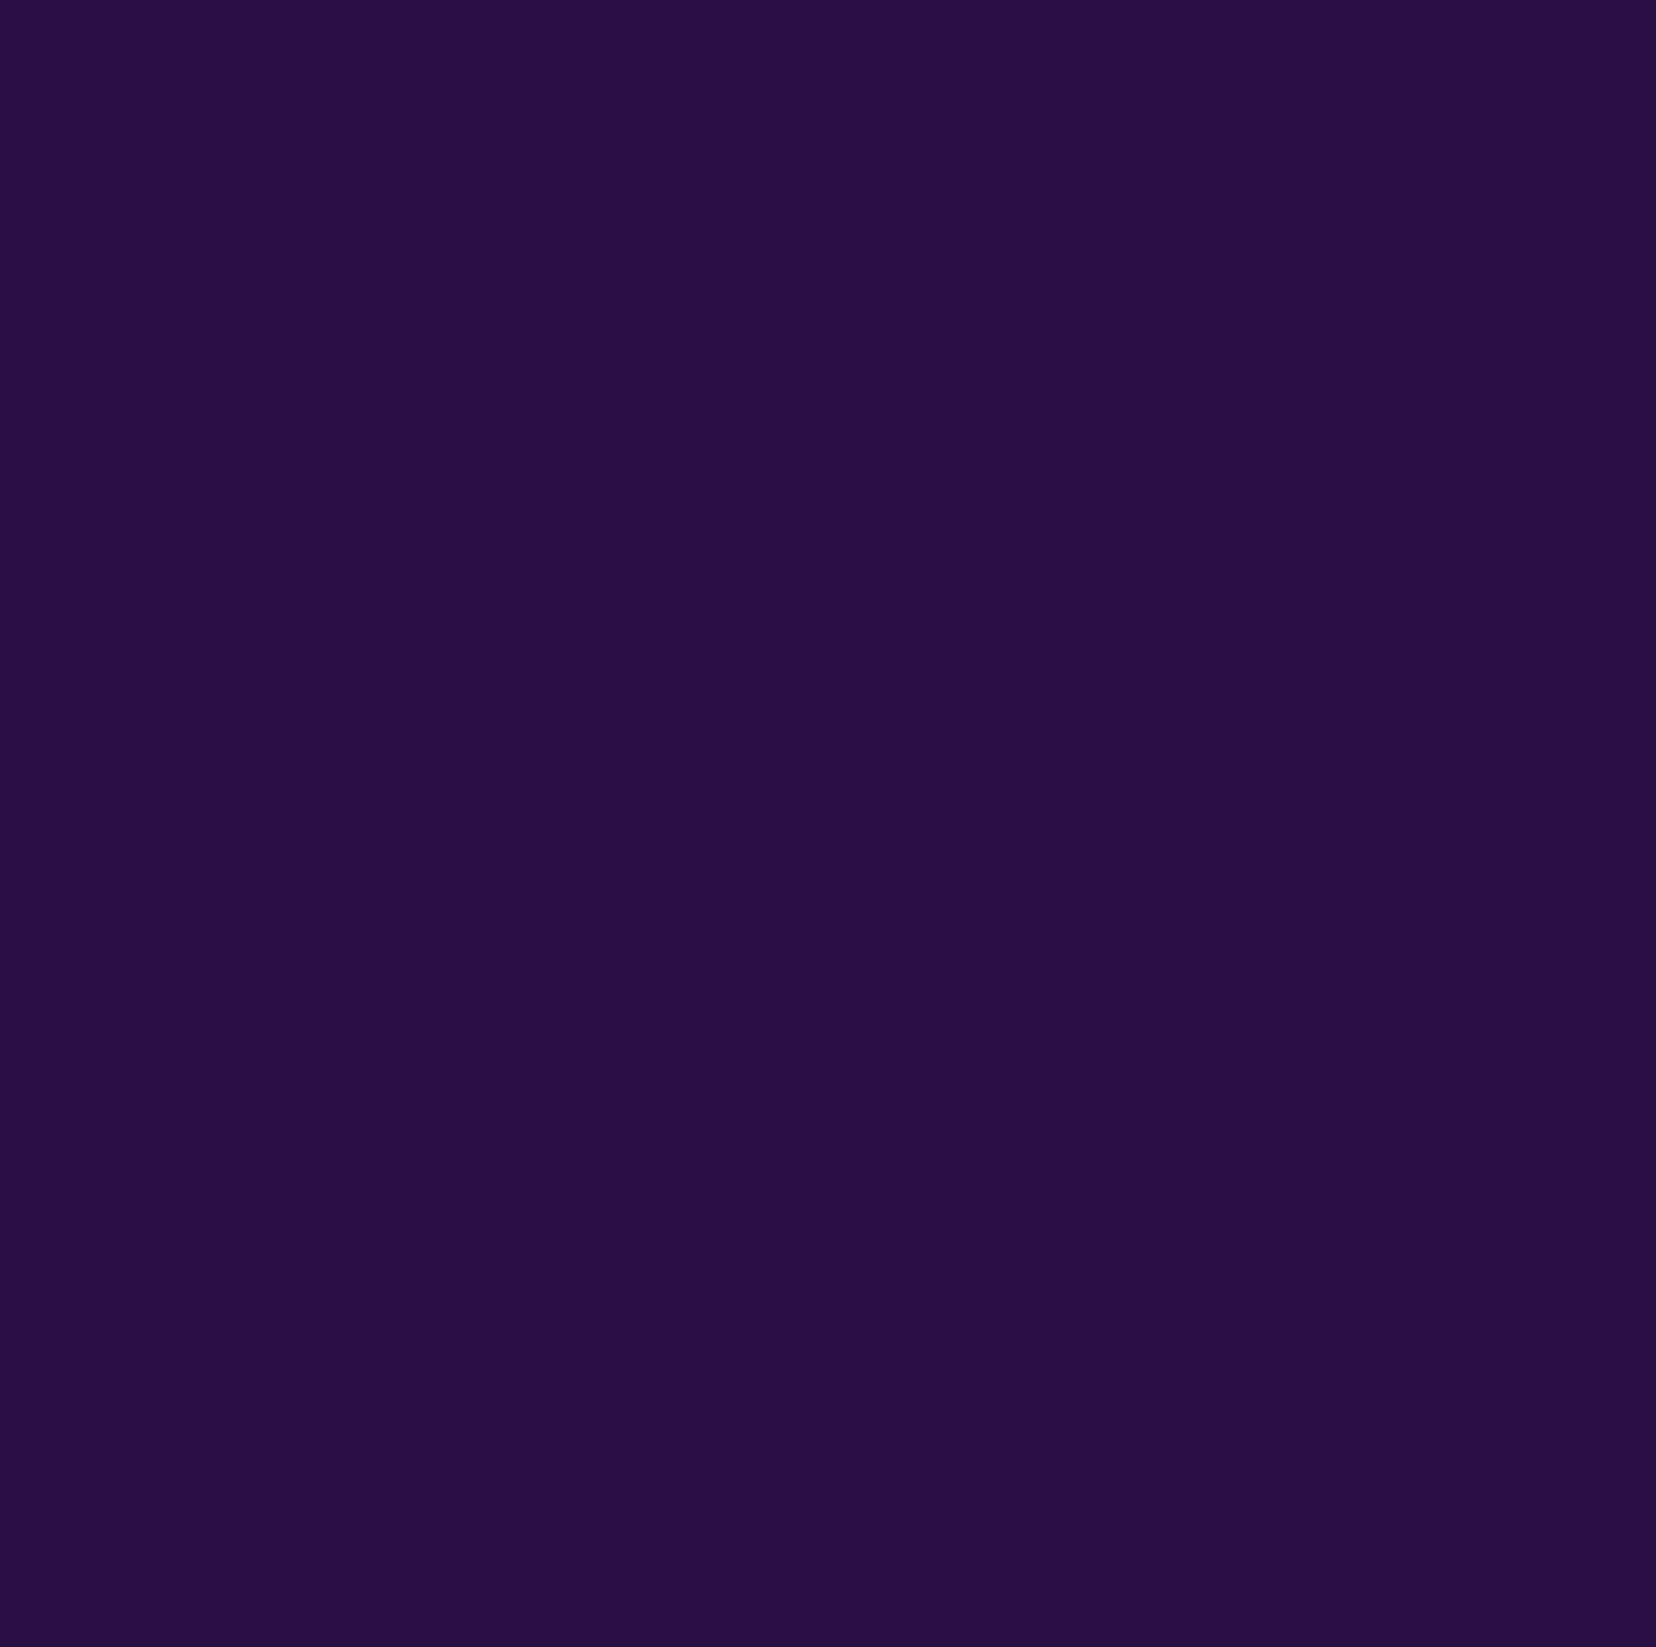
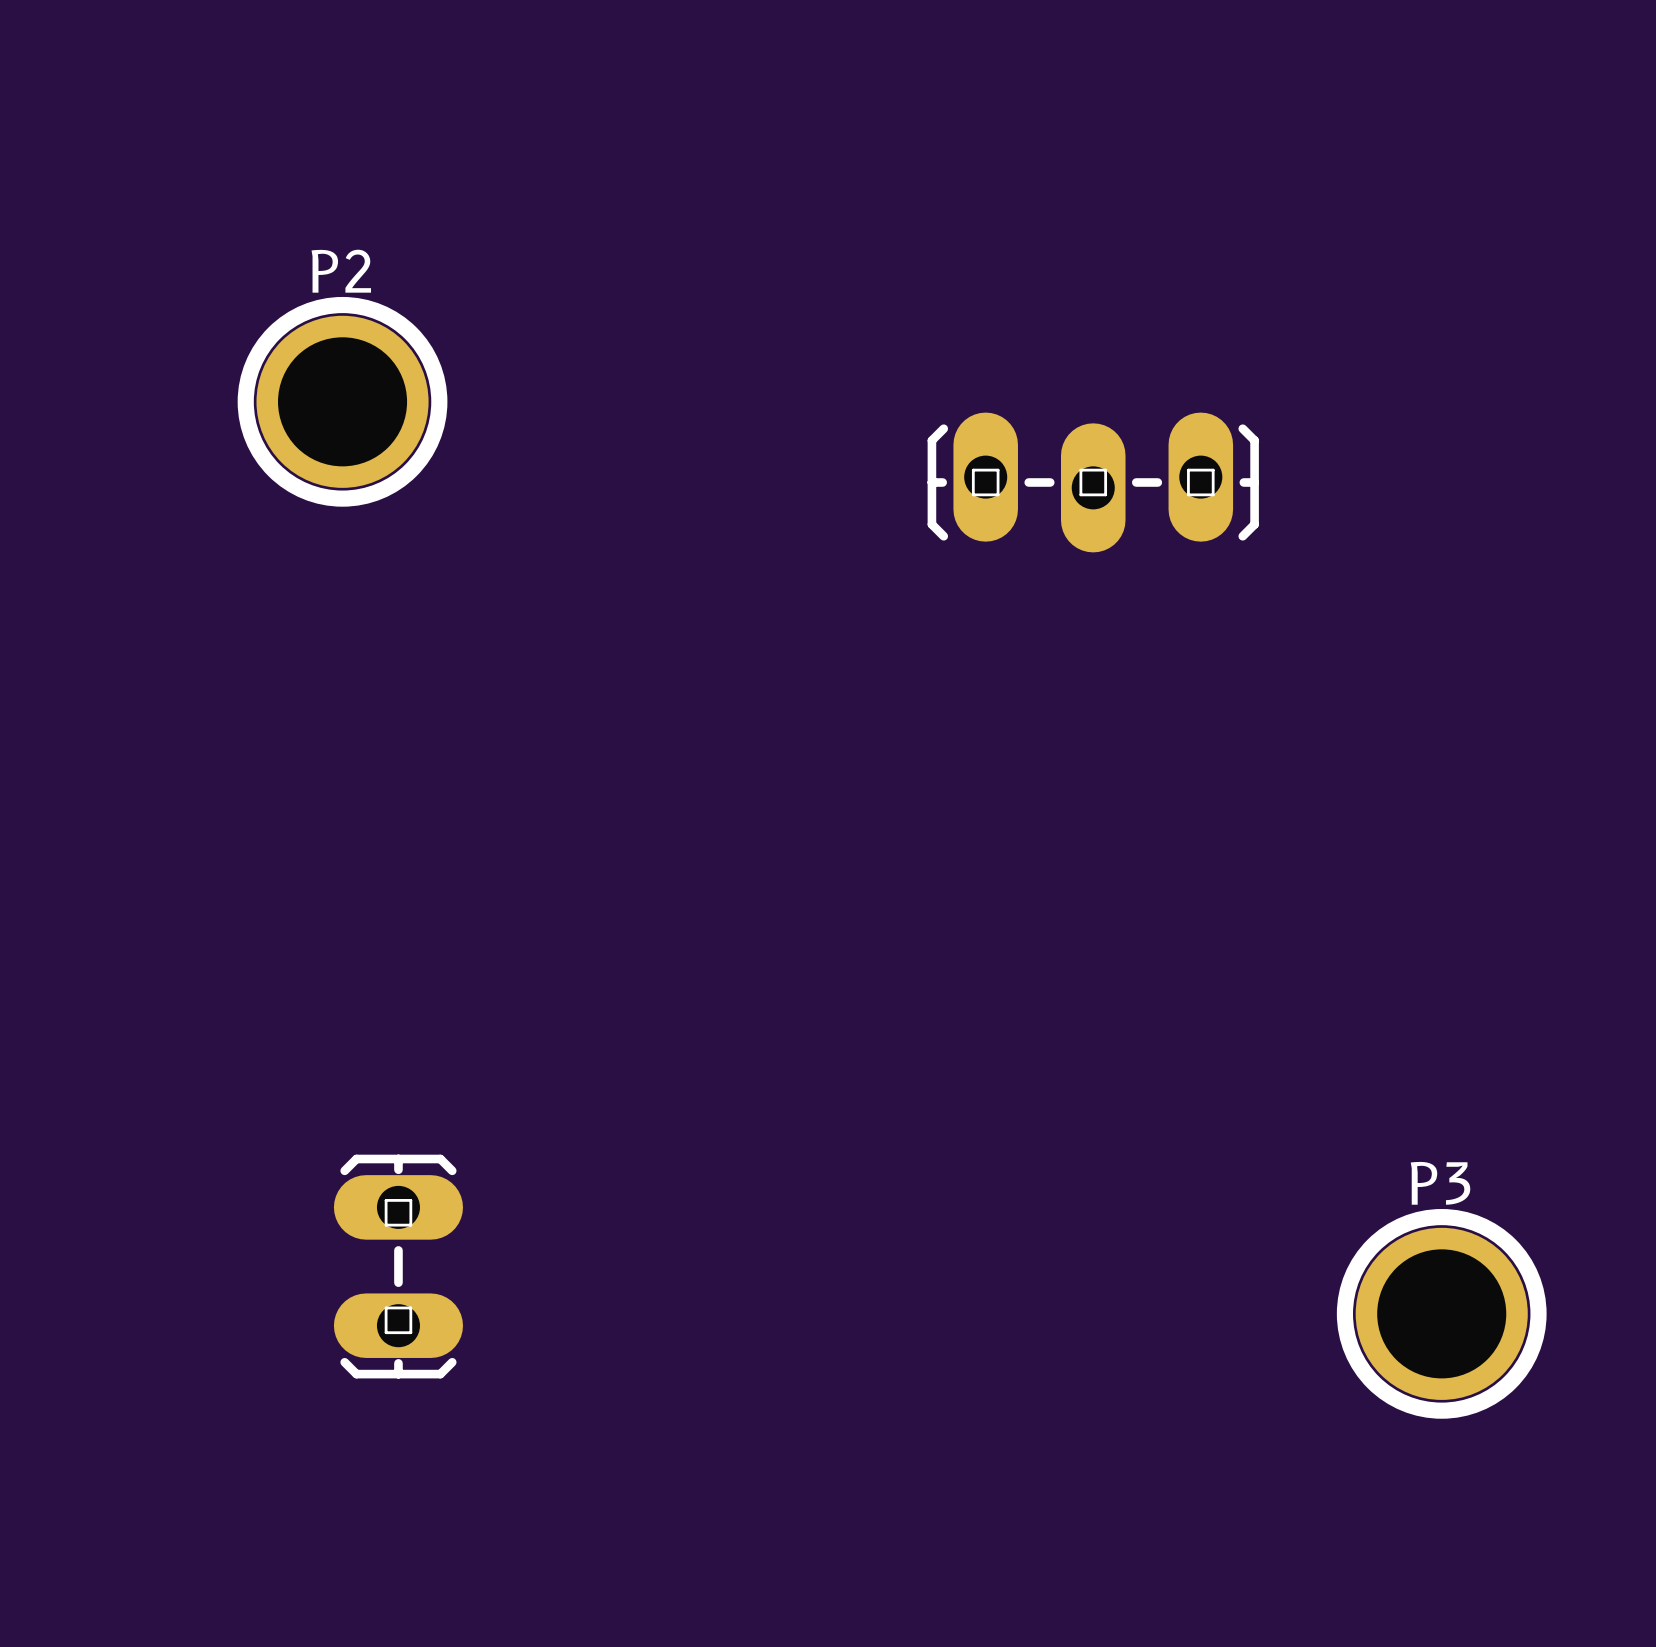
P2: none -> (342, 401)
part: none -> (1093, 482)
part: none -> (398, 1266)
P3: none -> (1441, 1313)

